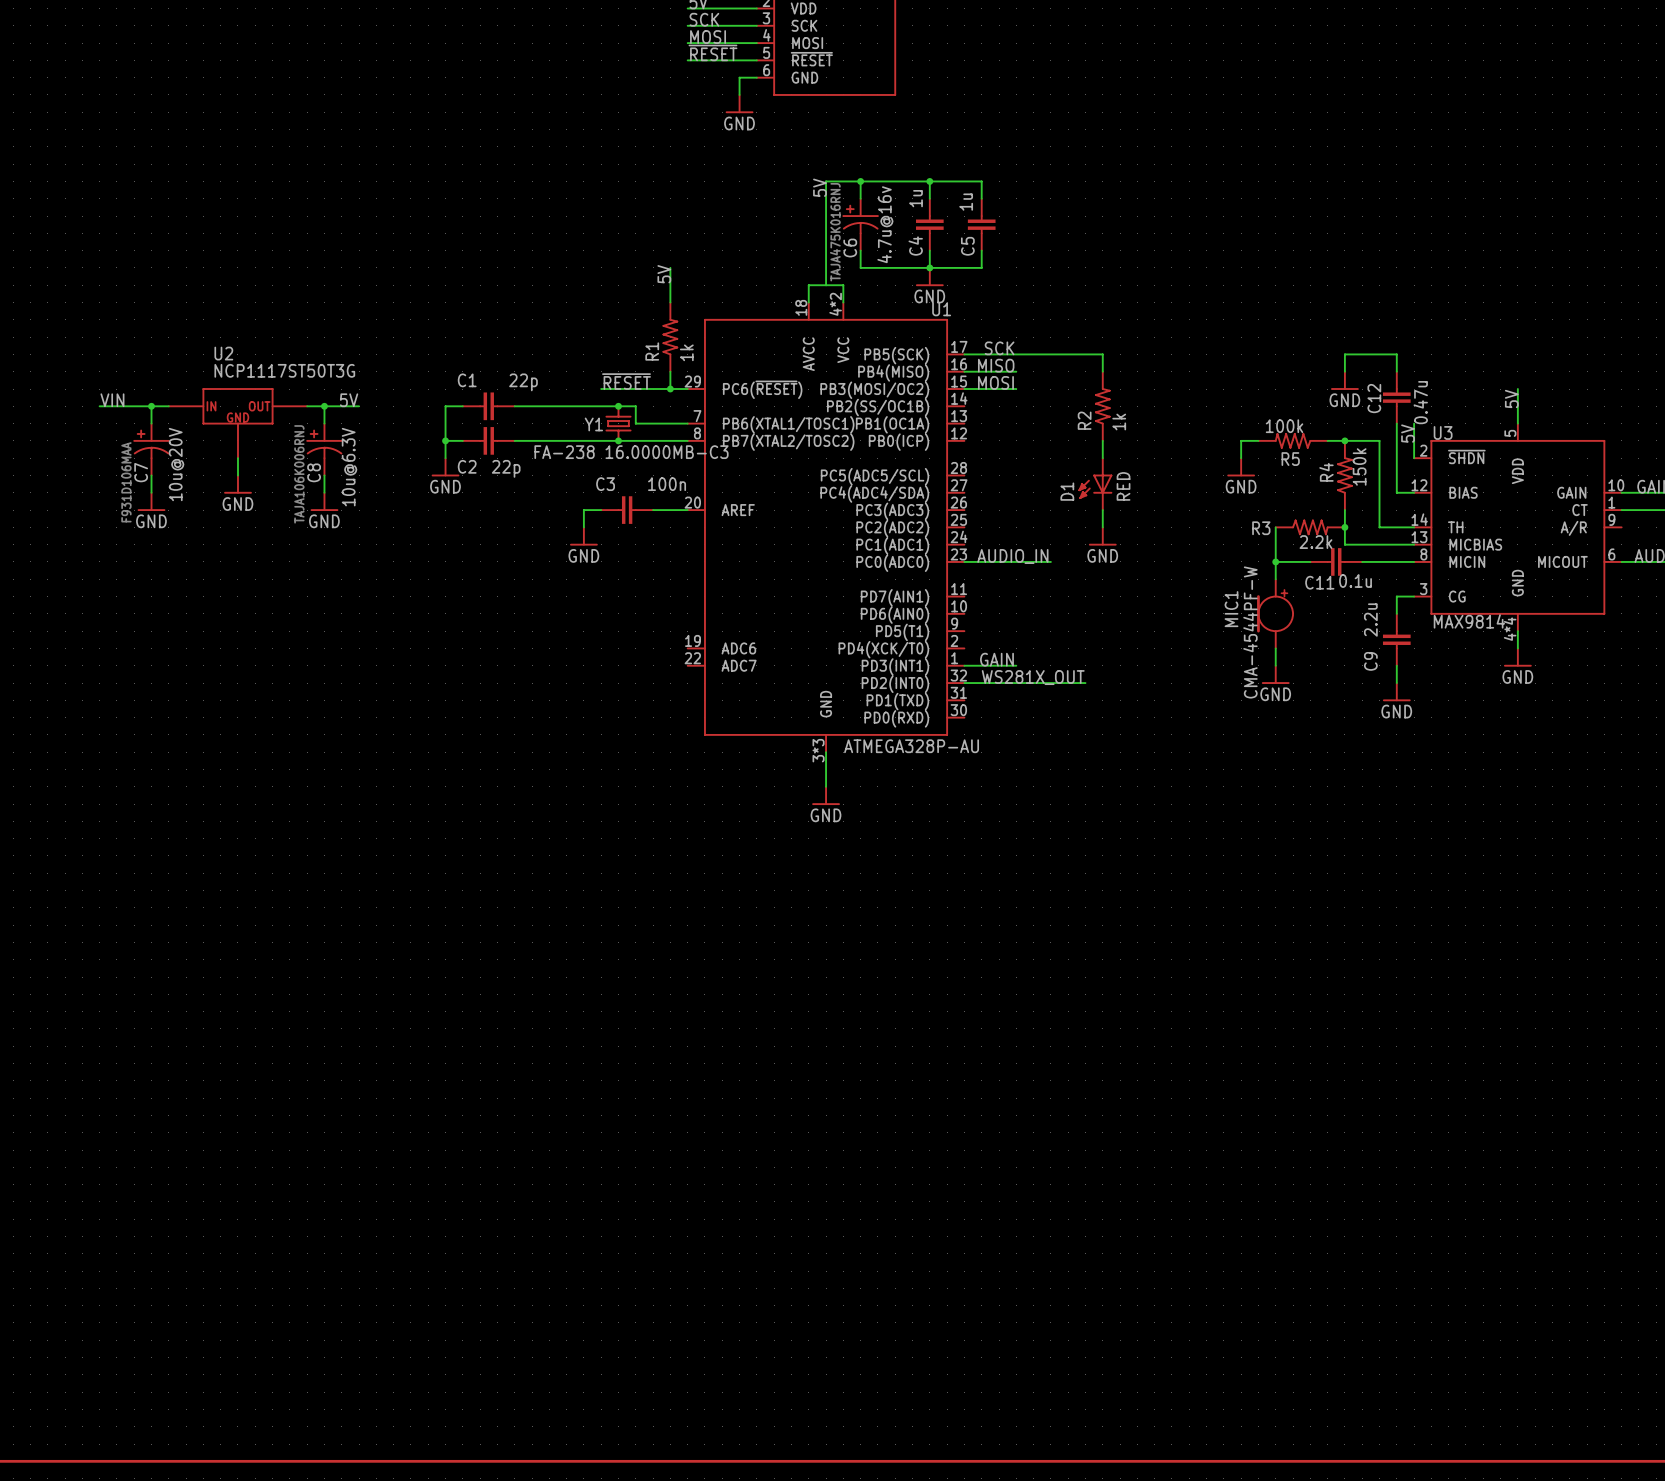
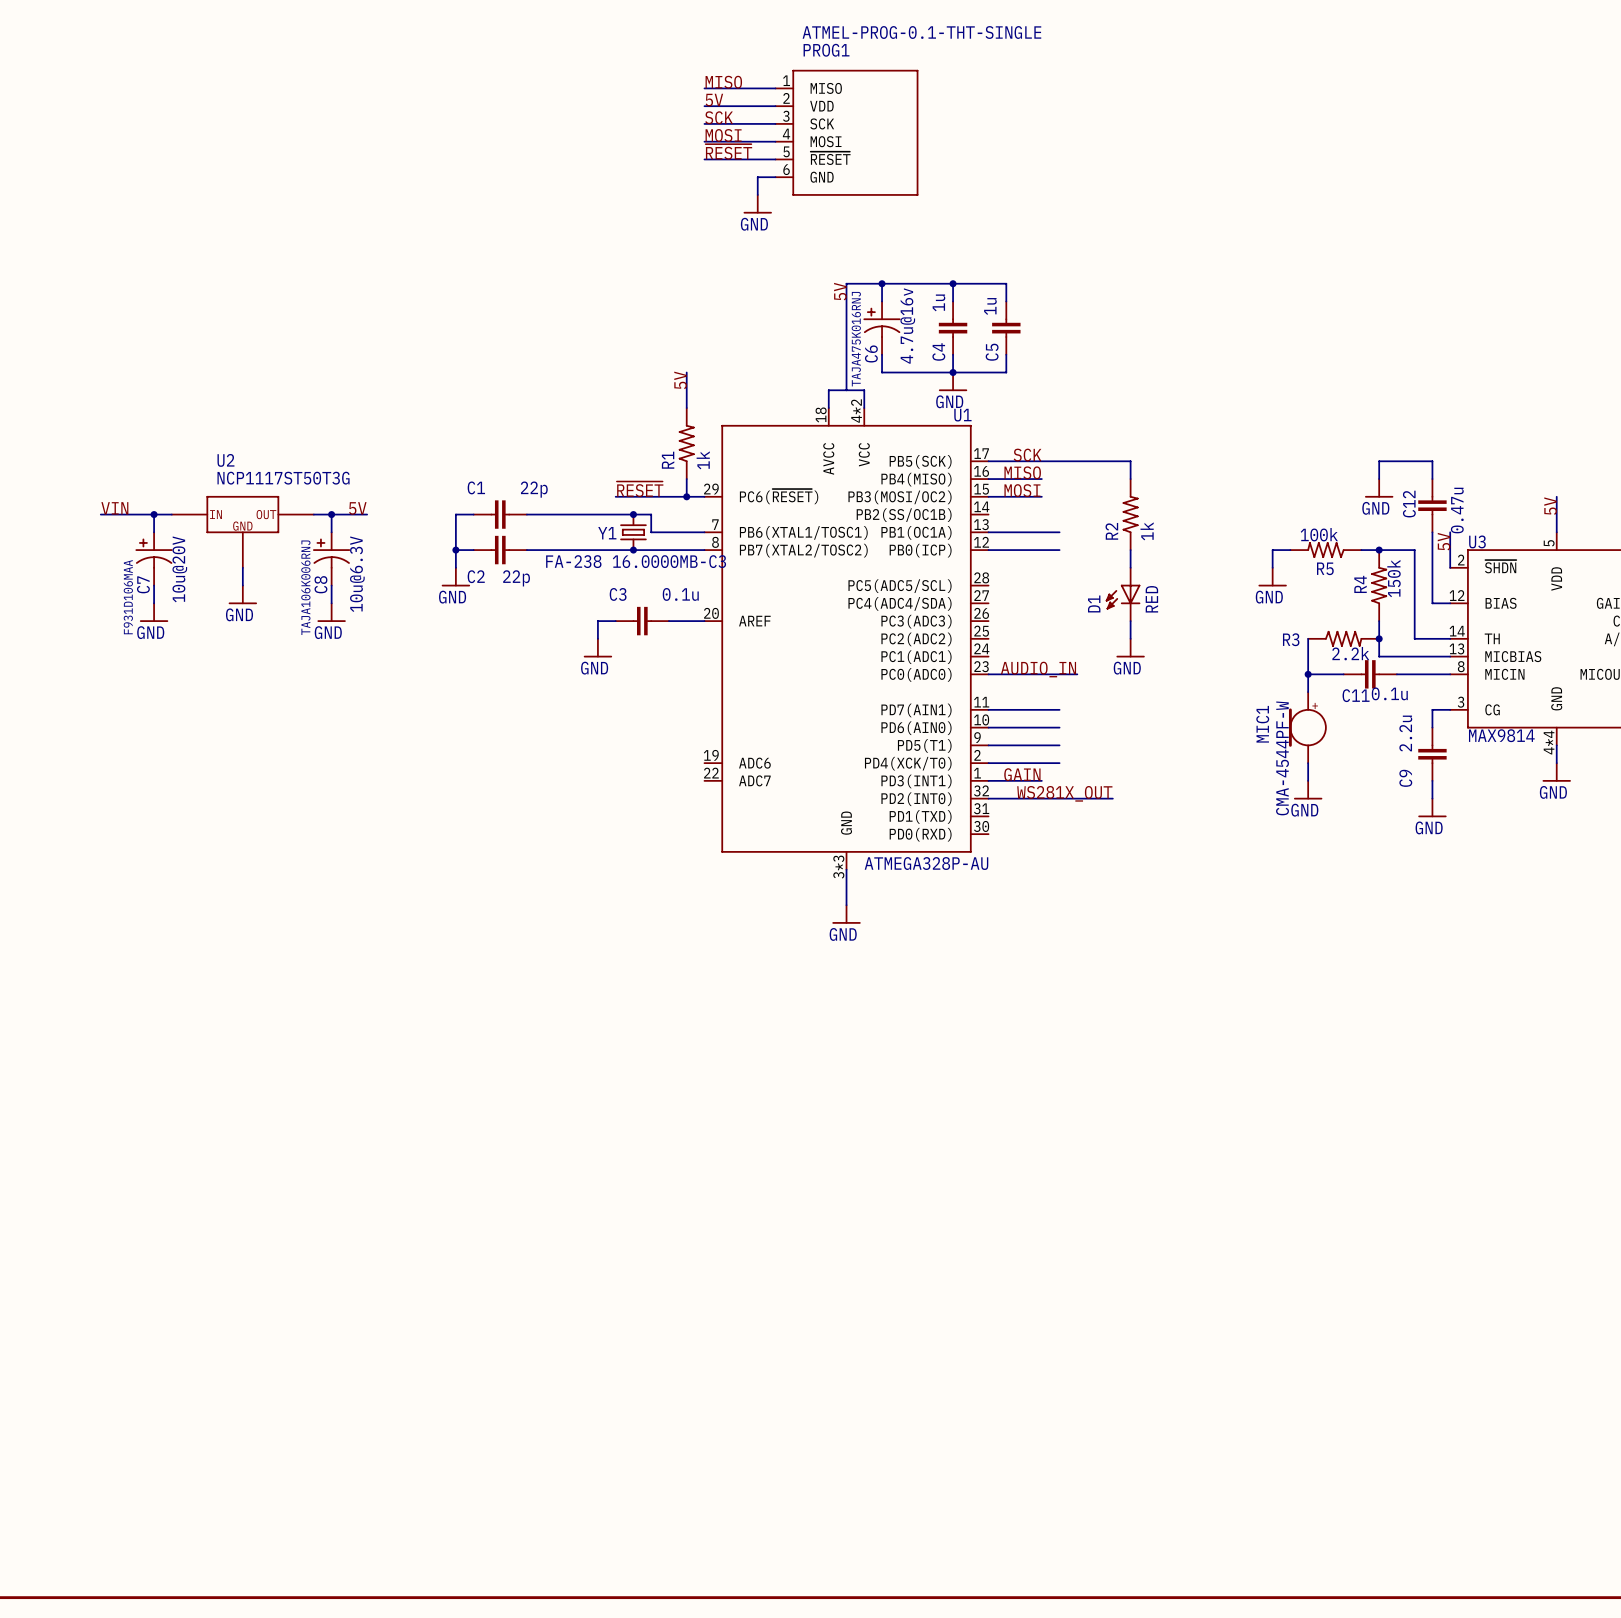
wire: none -> (988, 532) (1059, 532)
wire: none -> (988, 550) (1059, 550)
C3 value: 100n (667, 484) -> 0.1u (680, 594)
wire: none -> (988, 709) (1059, 709)
wire: none -> (988, 727) (1059, 727)
wire: none -> (988, 745) (1059, 745)
wire: none -> (988, 763) (1059, 763)

